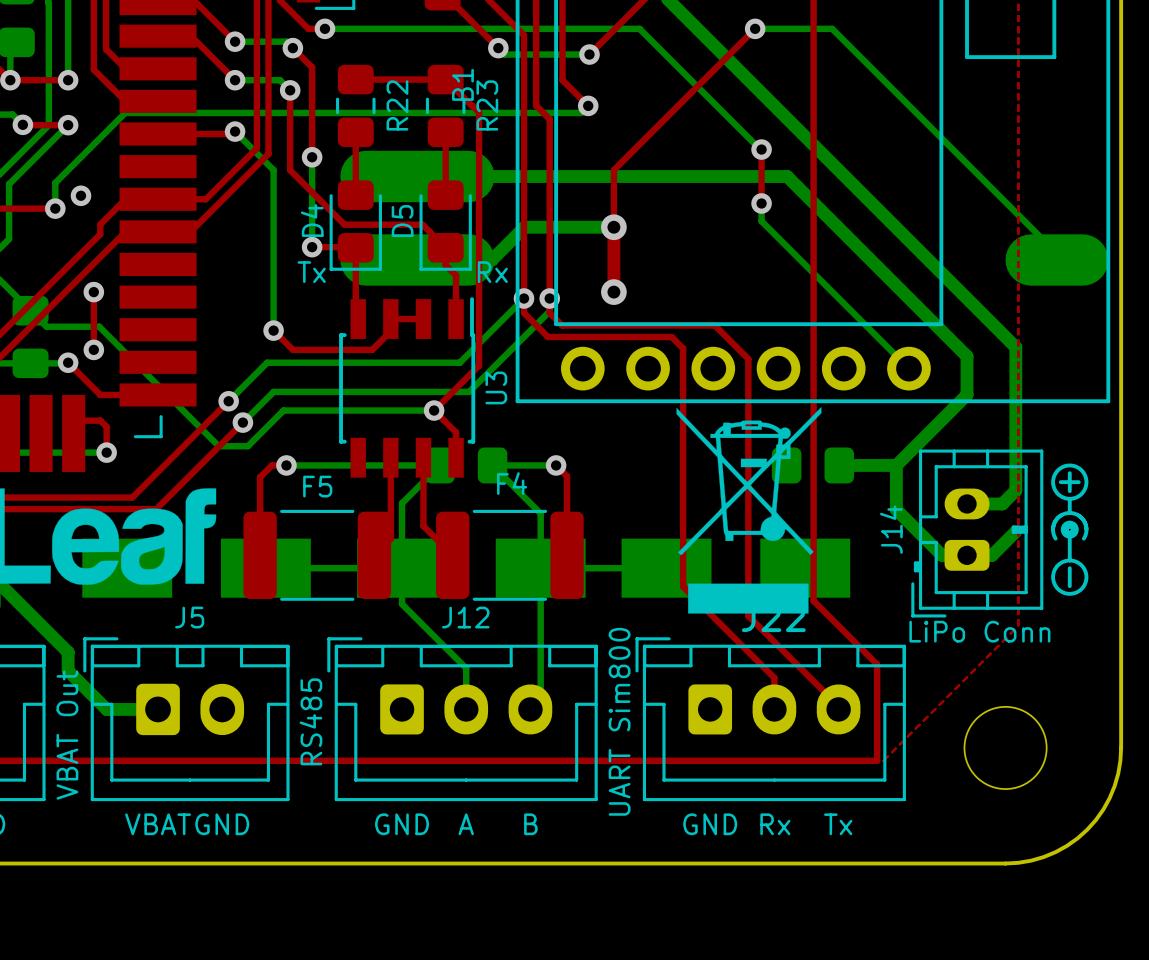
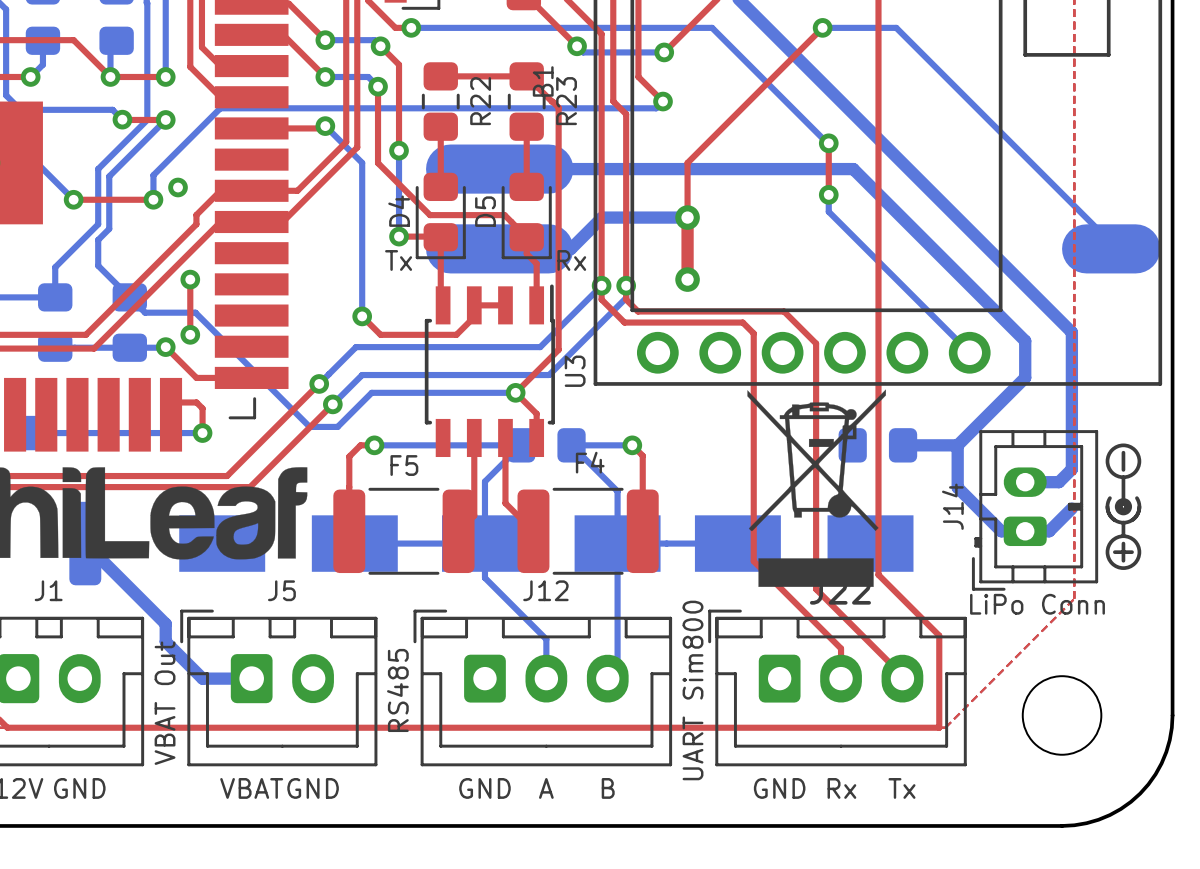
drawing shape: [1051, 463, 1089, 596] -> [1105, 443, 1142, 570]

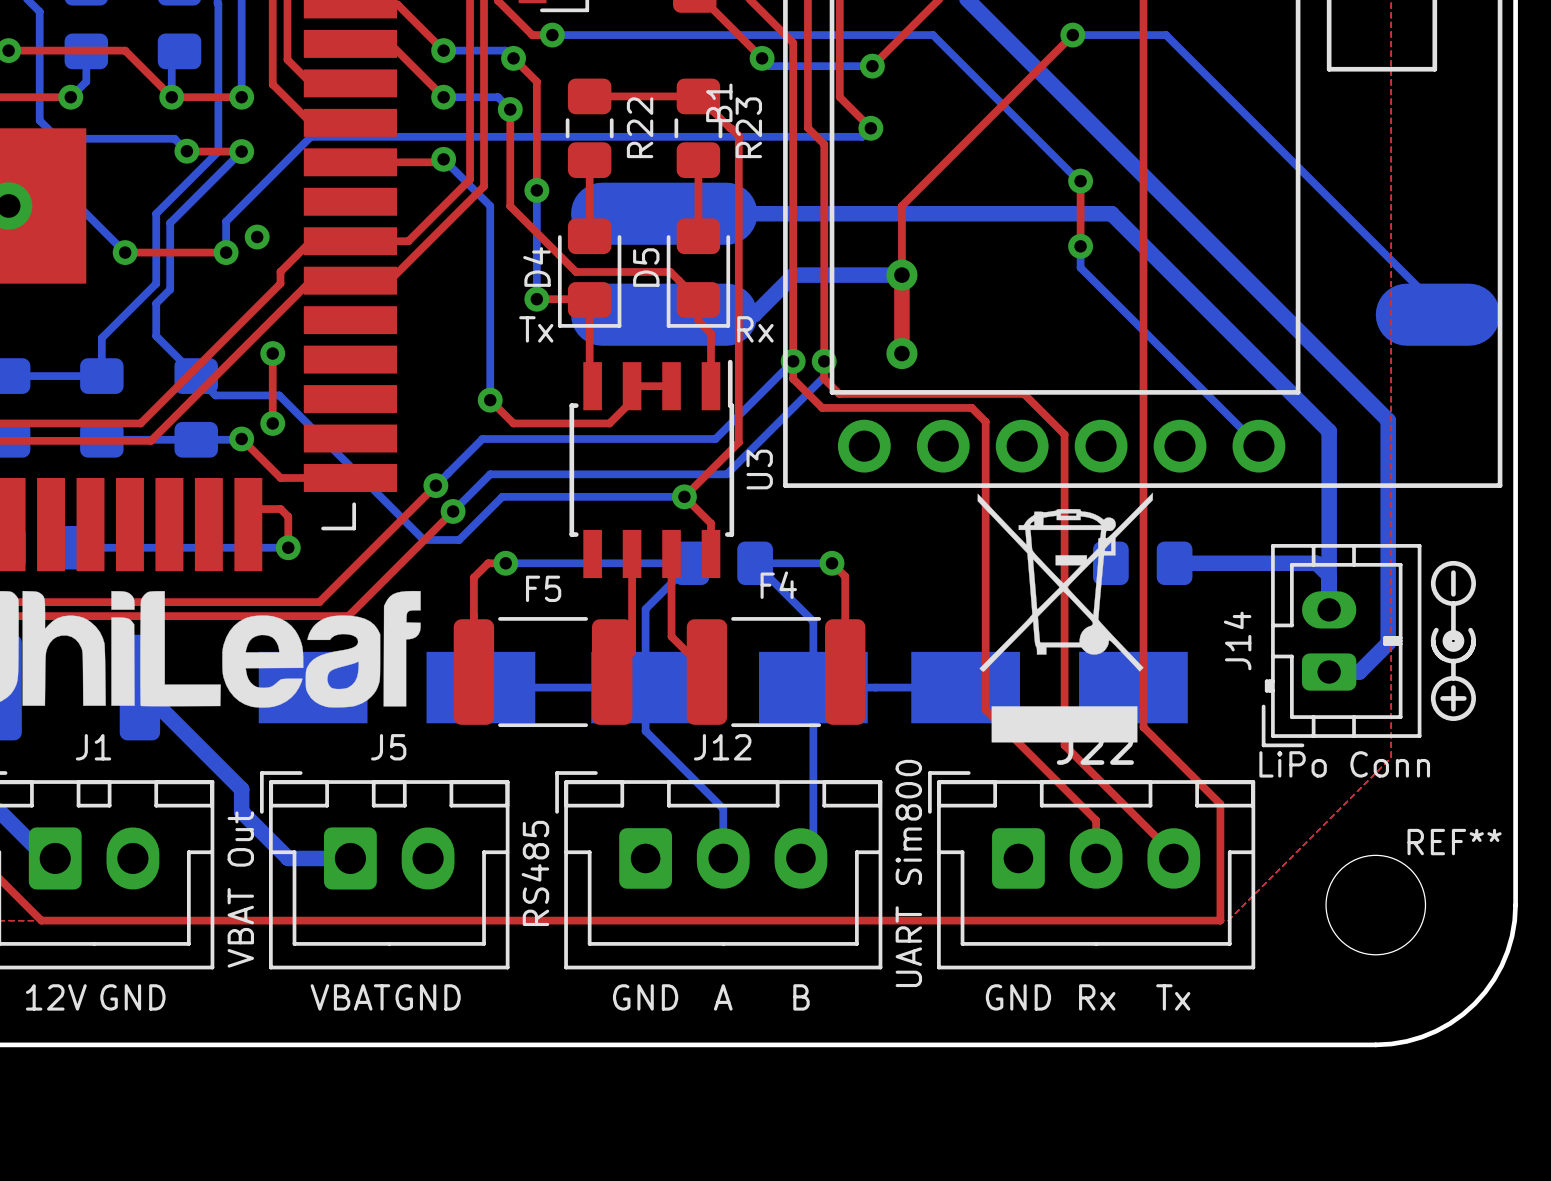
bottom track: (1025, 377) (957, 445) (957, 487) (1001, 531) (1025, 531) -> (1329, 477) (1329, 609)
bottom track: none -> (1243, 563) (1316, 563) (1329, 575)
bottom track: (1071, 469) (1058, 482) (1025, 482) -> (1388, 593) (1388, 643)
REF** name: none -> REF** (1454, 842)

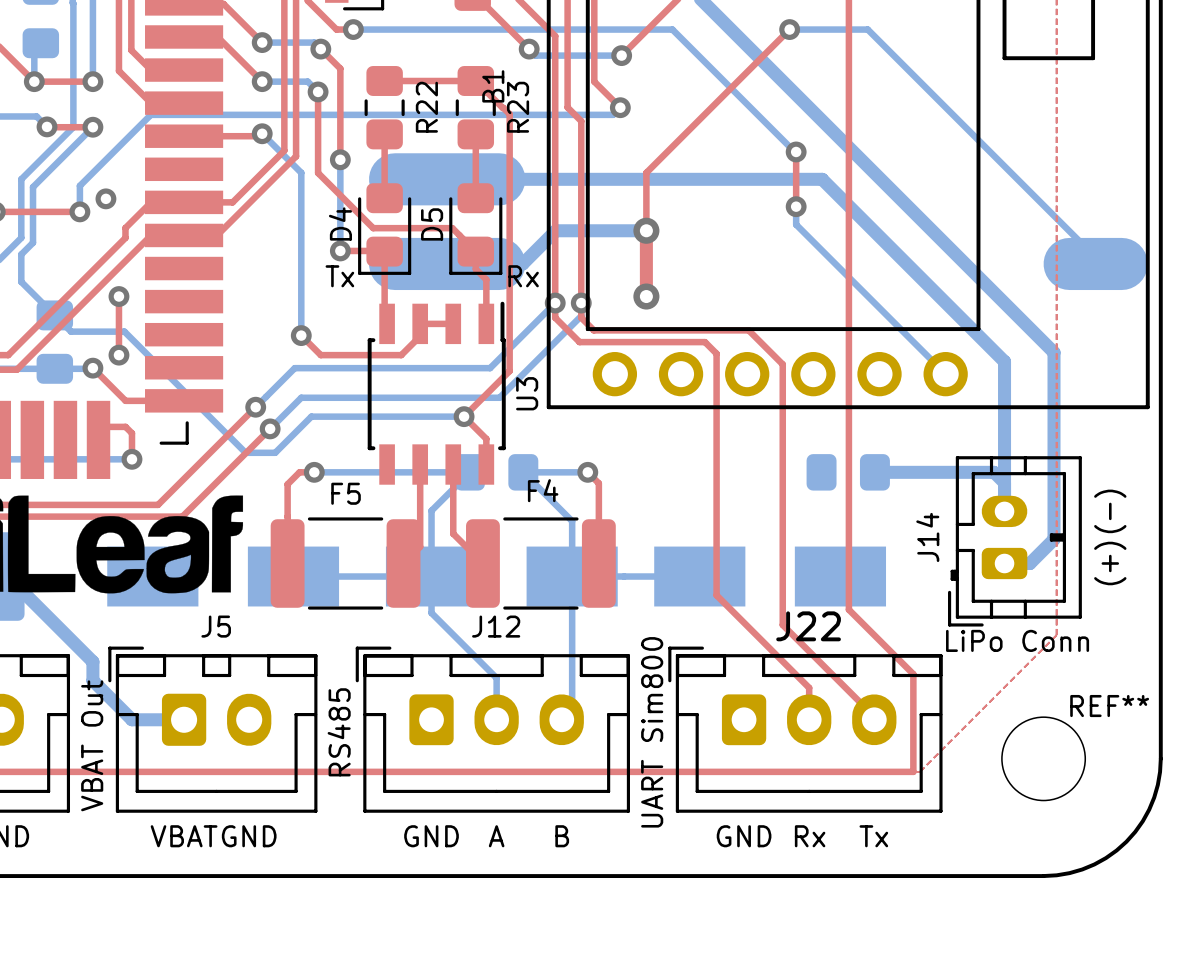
drawing: [977, 492, 1153, 743] -> none
drawing: [1430, 560, 1477, 721] -> none
text: none -> (-) (1110, 511)
text: none -> (+) (1110, 563)

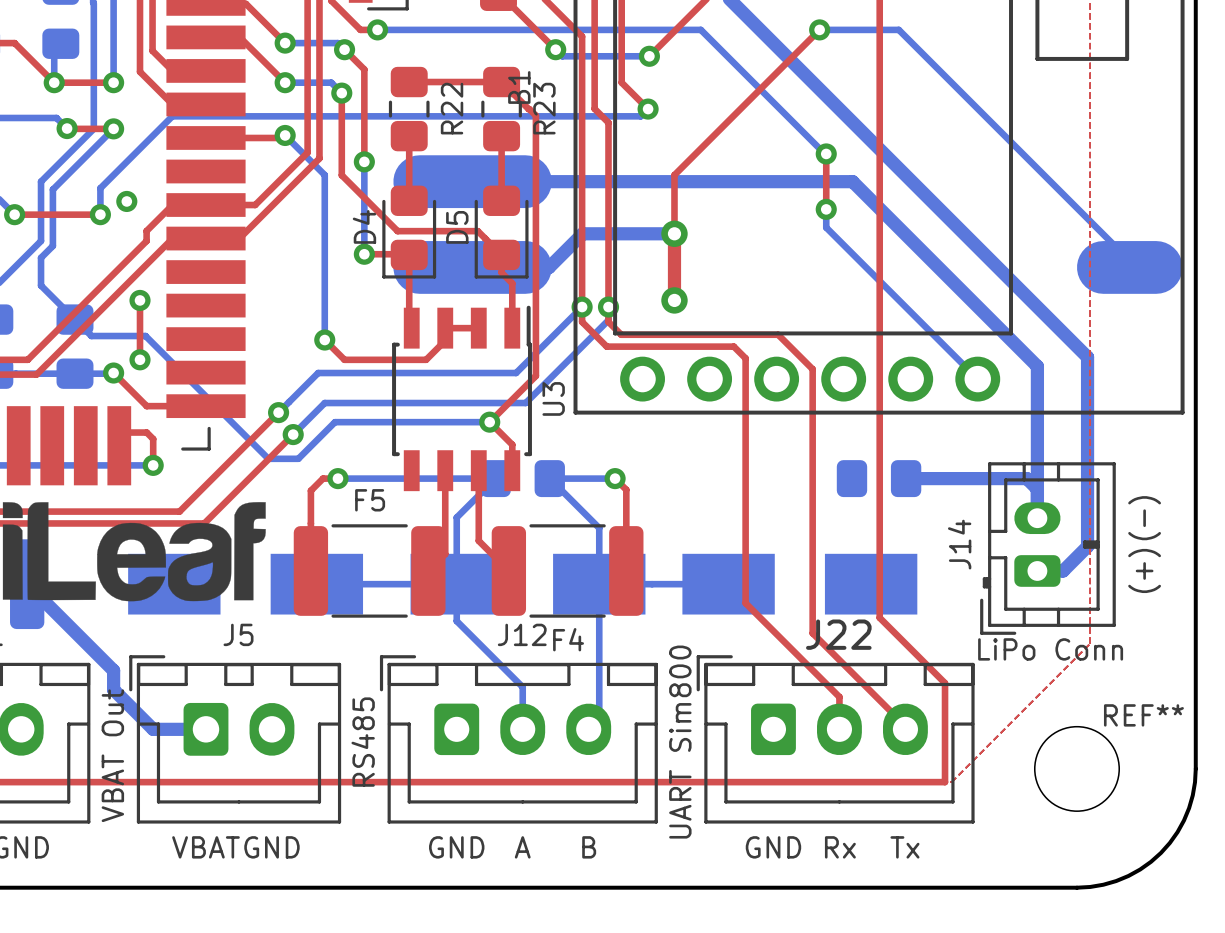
text: Tx (339, 276) -> none
text: Rx (523, 276) -> none
F4 name position: F4 (543, 490) -> F4 (568, 639)

